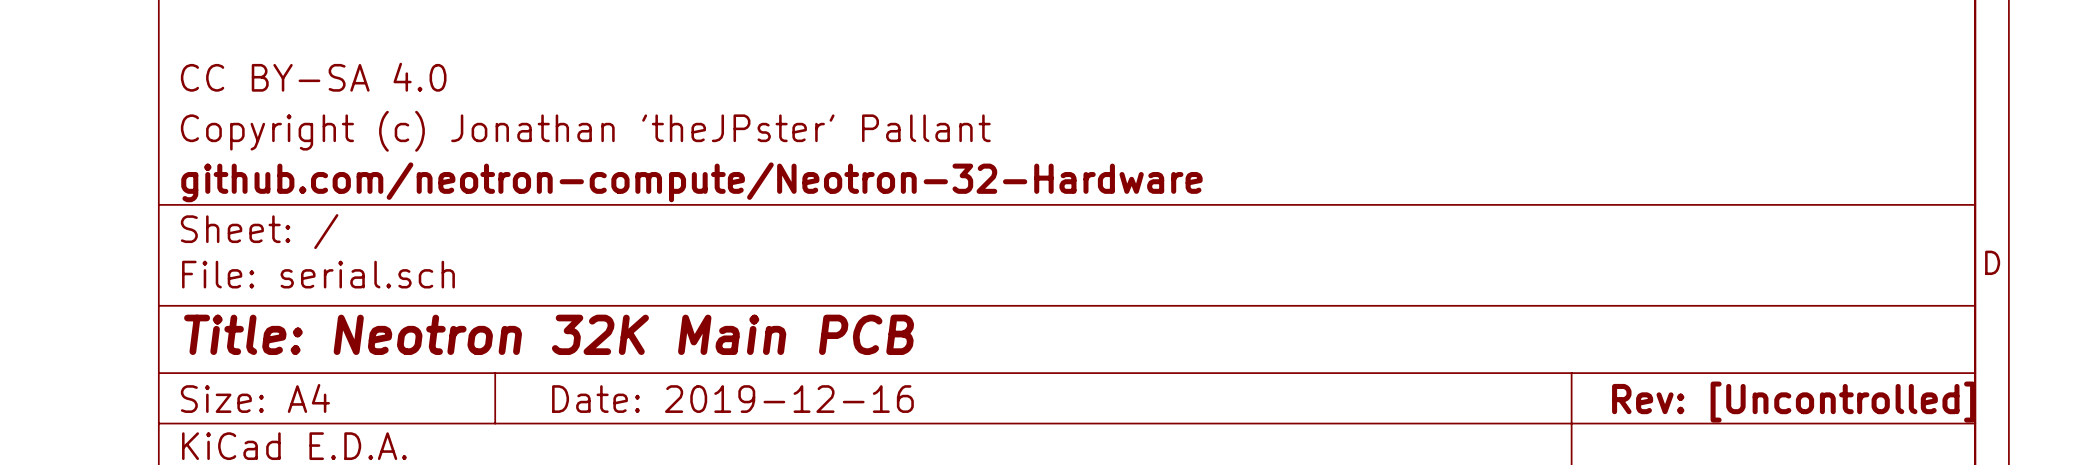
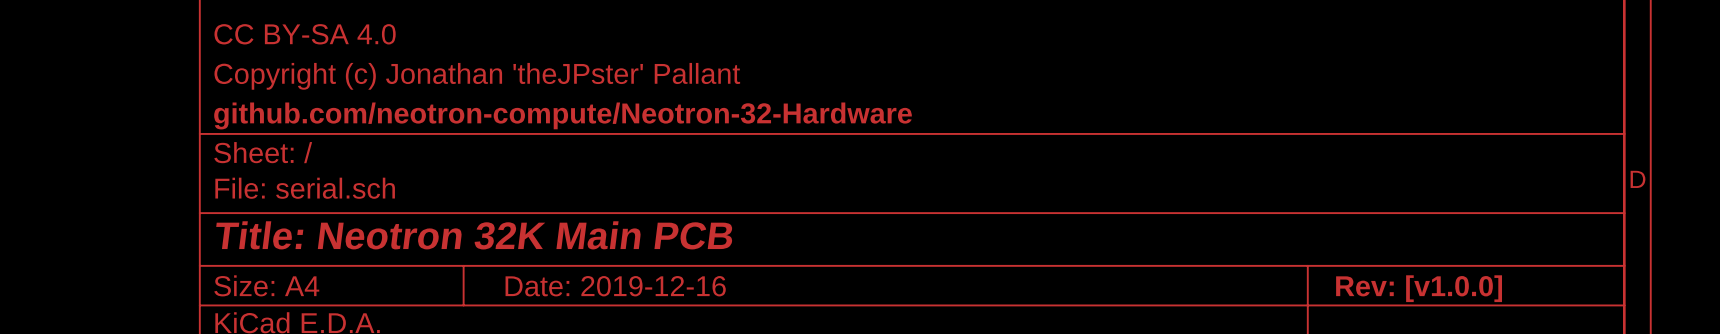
title block: Rev: [Uncontrolled] (1793, 402) -> Rev: [v1.0.0] (1419, 288)

